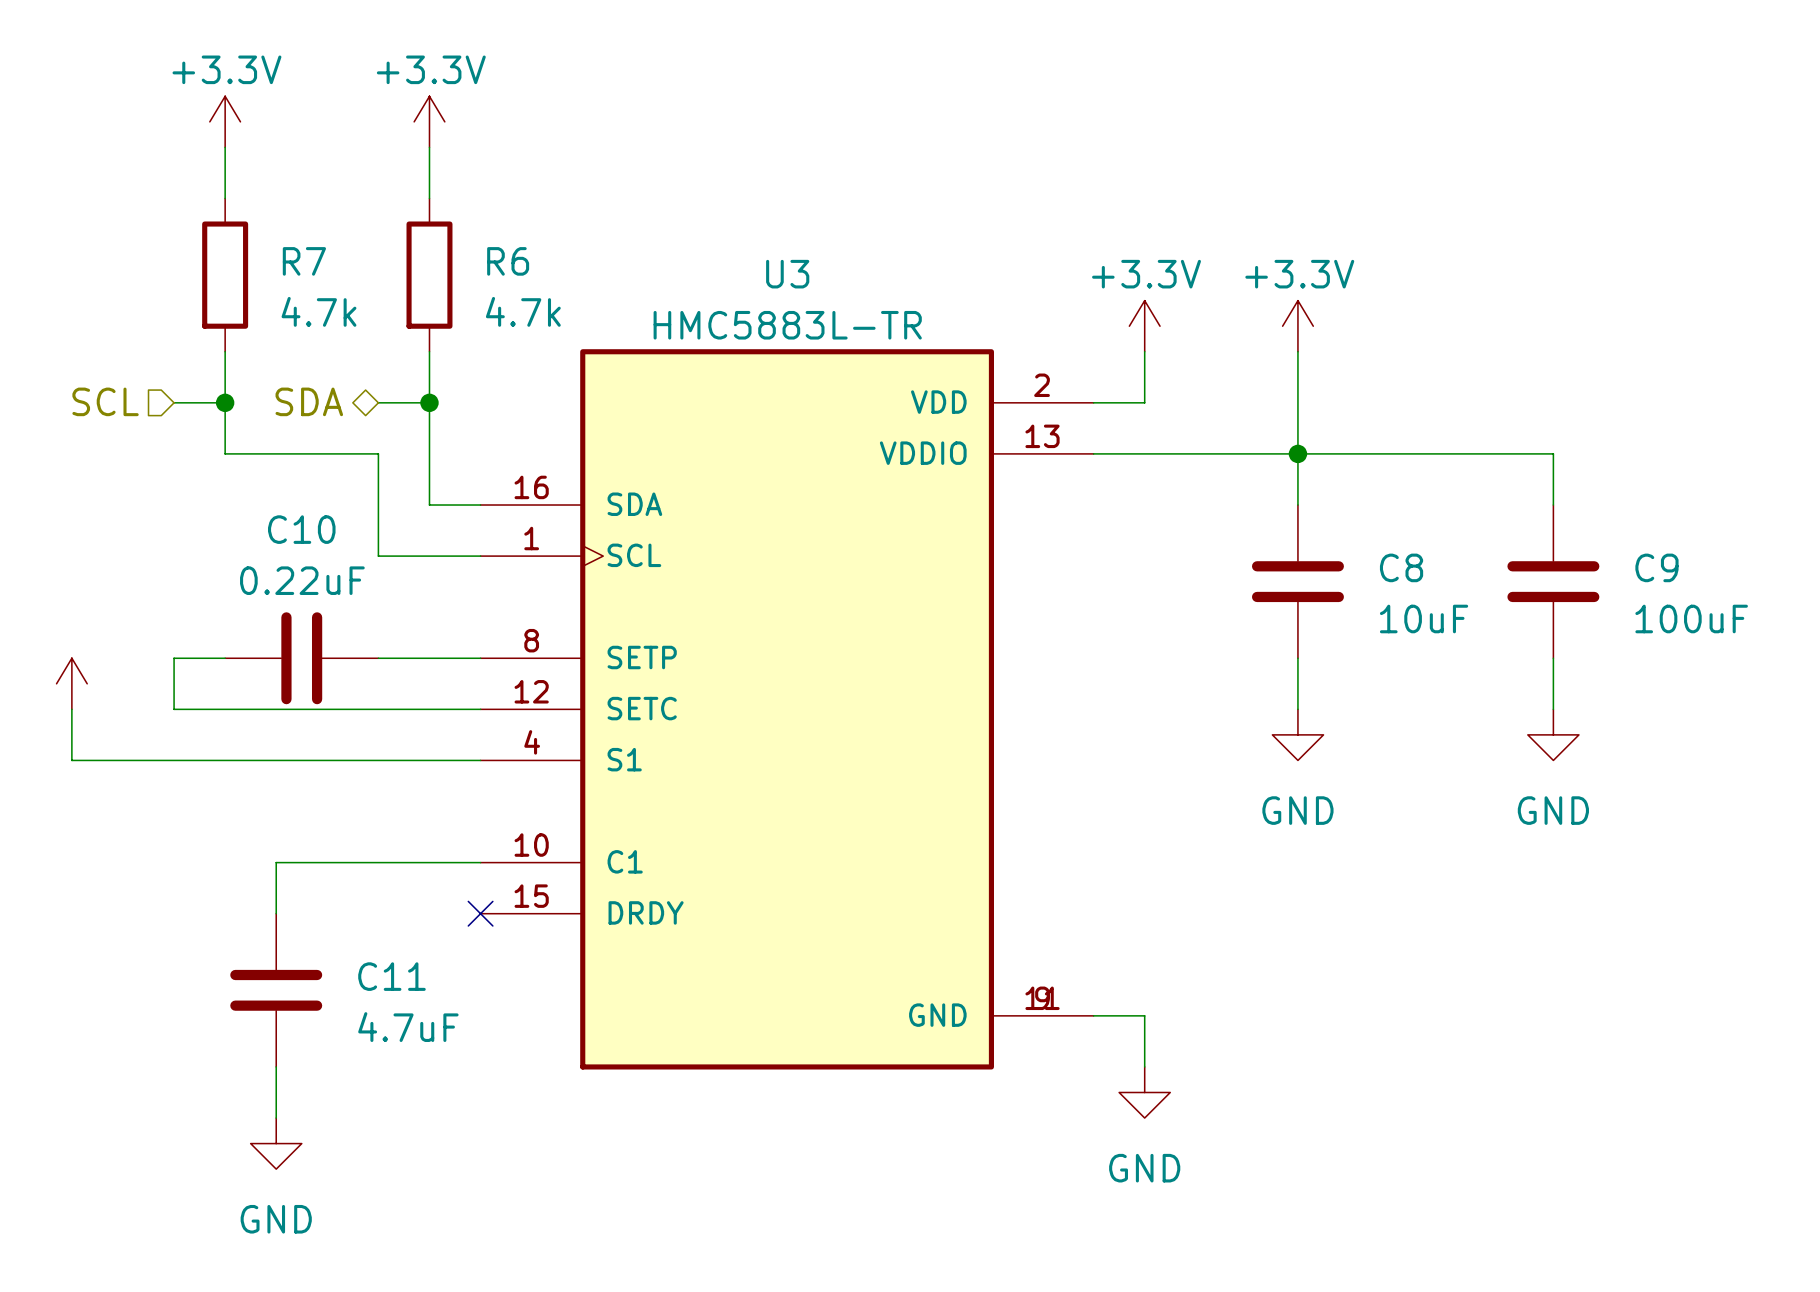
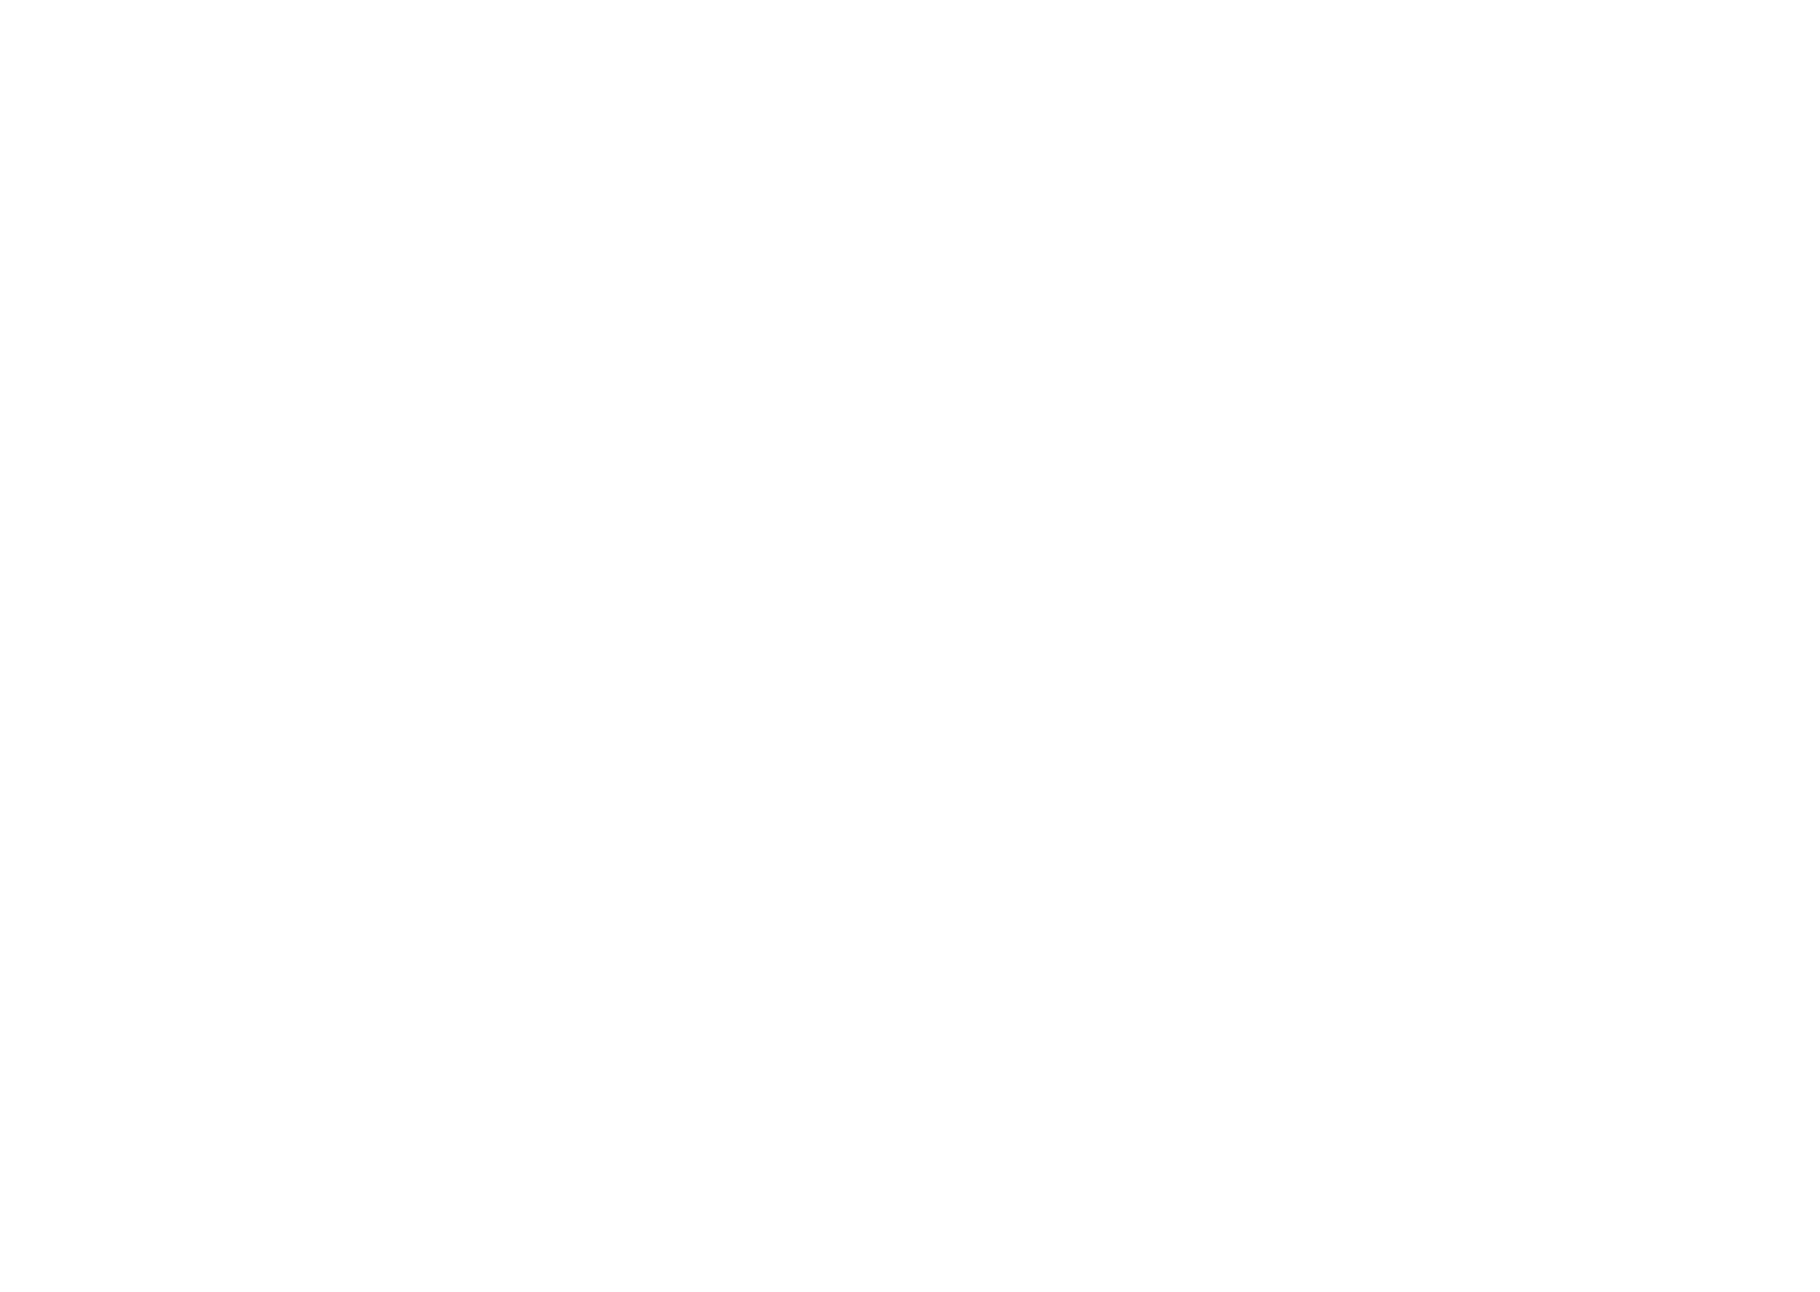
power symbol: +3.3V (225, 121) -> none
power symbol: +3.3V (429, 121) -> none
wire: (225, 147) (225, 198) -> none
wire: (429, 147) (429, 198) -> none
R7: 4.7k (225, 275) -> none
R6: 4.7k (429, 275) -> none
power symbol: +3.3V (1144, 326) -> none
power symbol: +3.3V (1297, 326) -> none
wire: (225, 351) (225, 453) (378, 453) (378, 556) (480, 556) -> none
wire: (429, 351) (429, 505) (480, 505) -> none
wire: (1144, 351) (1144, 402) (1093, 402) -> none
wire: (1297, 351) (1297, 505) -> none
hierarchical label: SCL (105, 401) -> none
hierarchical label: SDA (309, 401) -> none
wire: (174, 402) (225, 402) -> none
junction: (225, 402) -> none
wire: (378, 402) (429, 402) -> none
junction: (429, 402) -> none
wire: (1093, 453) (1553, 453) (1553, 505) -> none
junction: (1297, 453) -> none
C8: 10uF (1297, 581) -> none
C9: 100uF (1553, 581) -> none
wire: (225, 658) (174, 658) (174, 709) (480, 709) -> none
C10: 0.22uF (301, 658) -> none
wire: (378, 658) (480, 658) -> none
wire: (1297, 658) (1297, 709) -> none
wire: (1553, 658) (1553, 709) -> none
power symbol: (71, 683) -> none
wire: (71, 709) (71, 760) (480, 760) -> none
U3: HMC5883L-TR (787, 709) -> none
power symbol: GND (1297, 734) -> none
power symbol: GND (1553, 734) -> none
wire: (480, 862) (276, 862) (276, 913) -> none
no-connect mark: (480, 913) -> none
C11: 4.7uF (276, 990) -> none
wire: (1093, 1015) (1144, 1015) (1144, 1066) -> none
wire: (276, 1066) (276, 1118) -> none
power symbol: GND (1144, 1092) -> none
power symbol: GND (276, 1143) -> none

